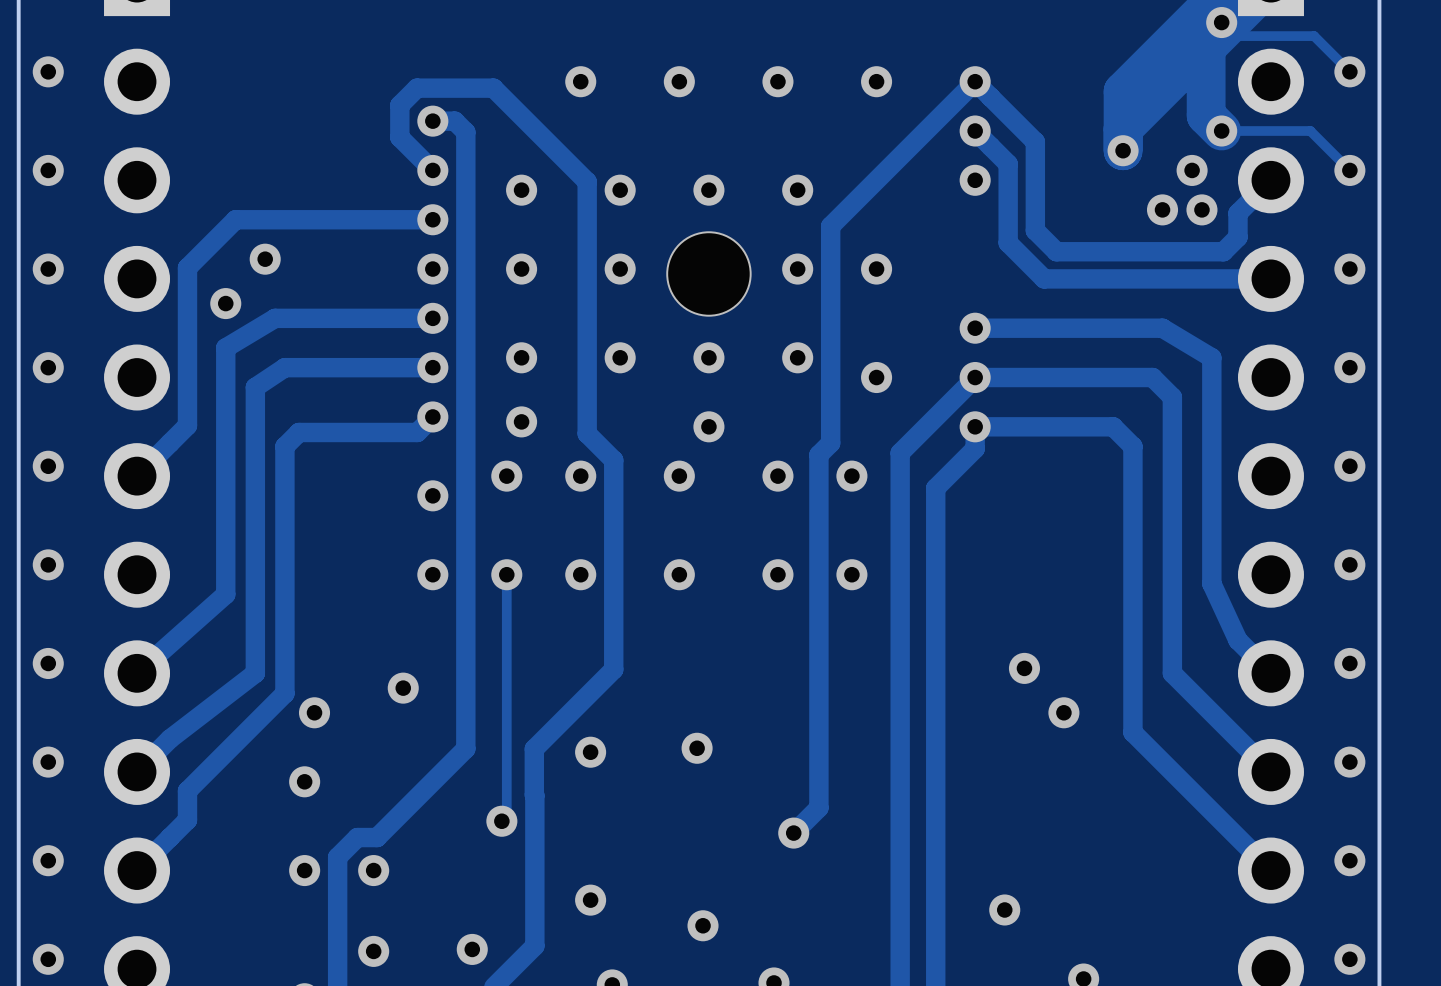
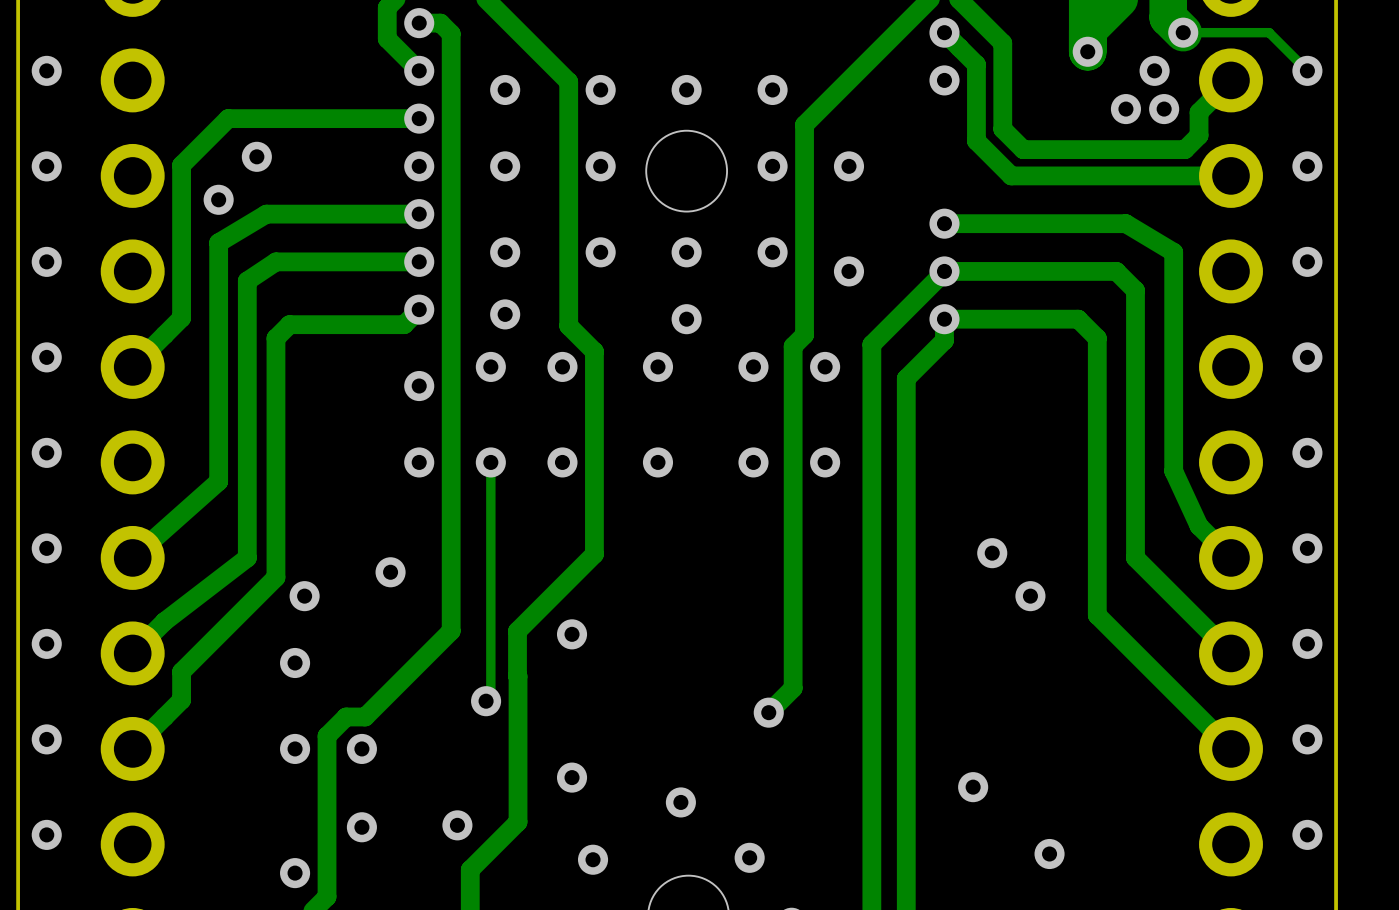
via: (697, 748) -> none

